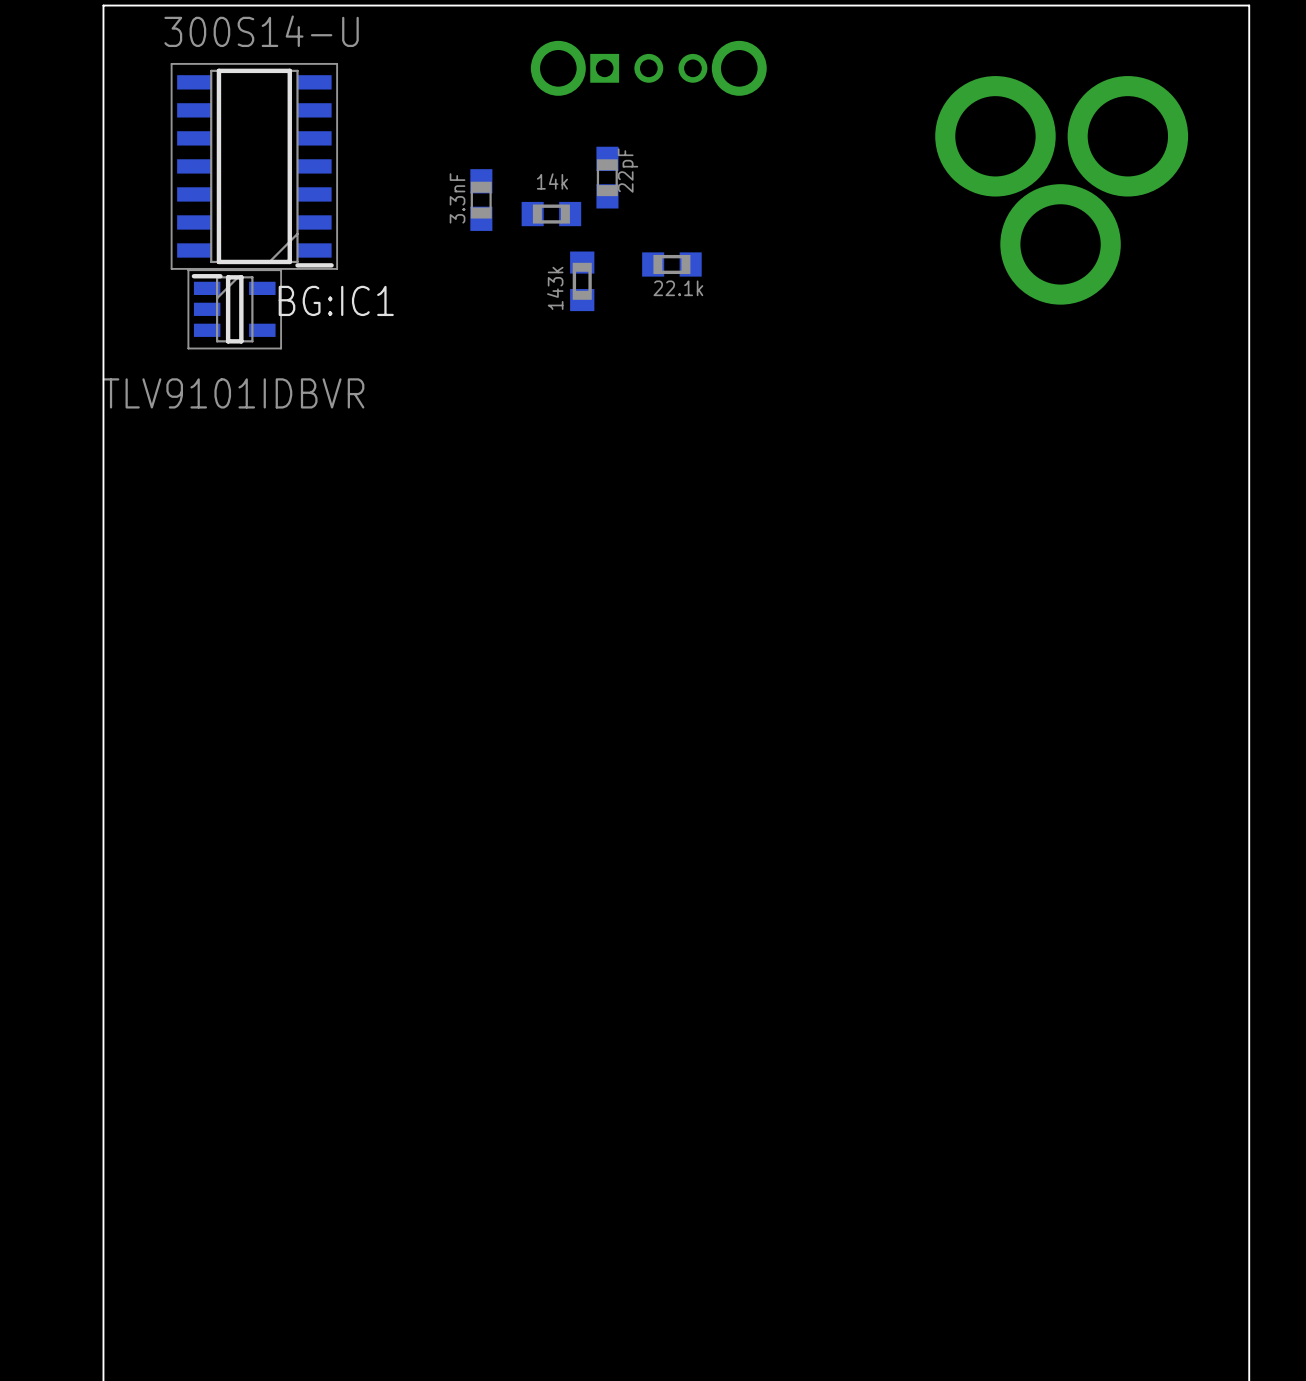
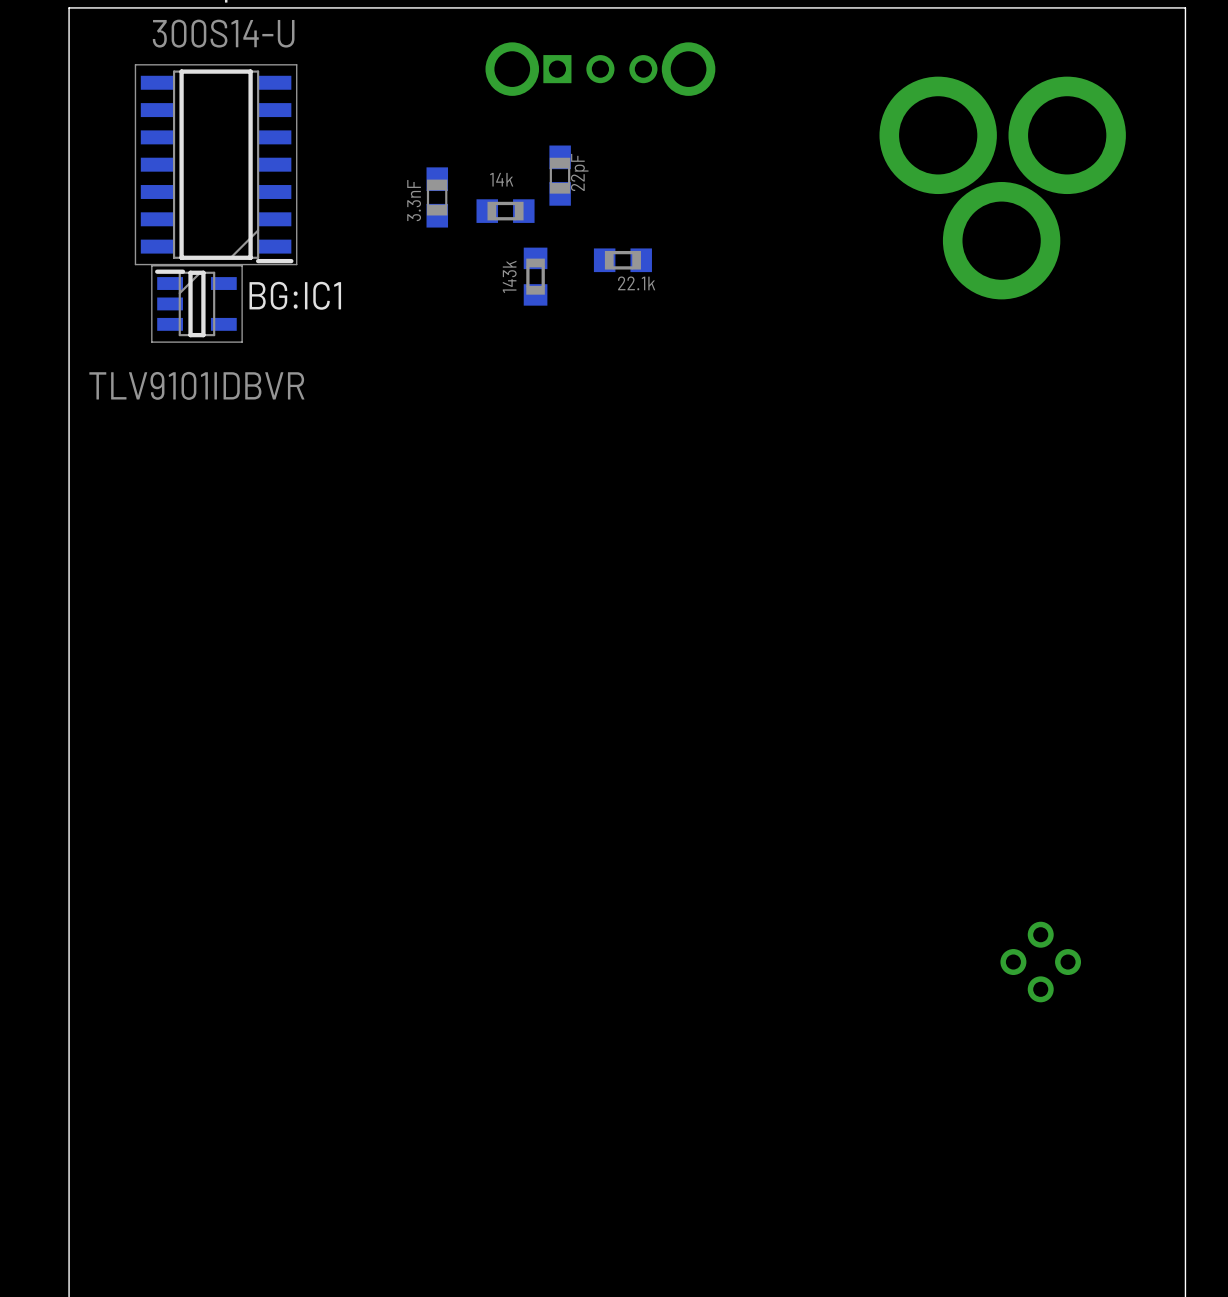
part: none -> (1040, 962)

